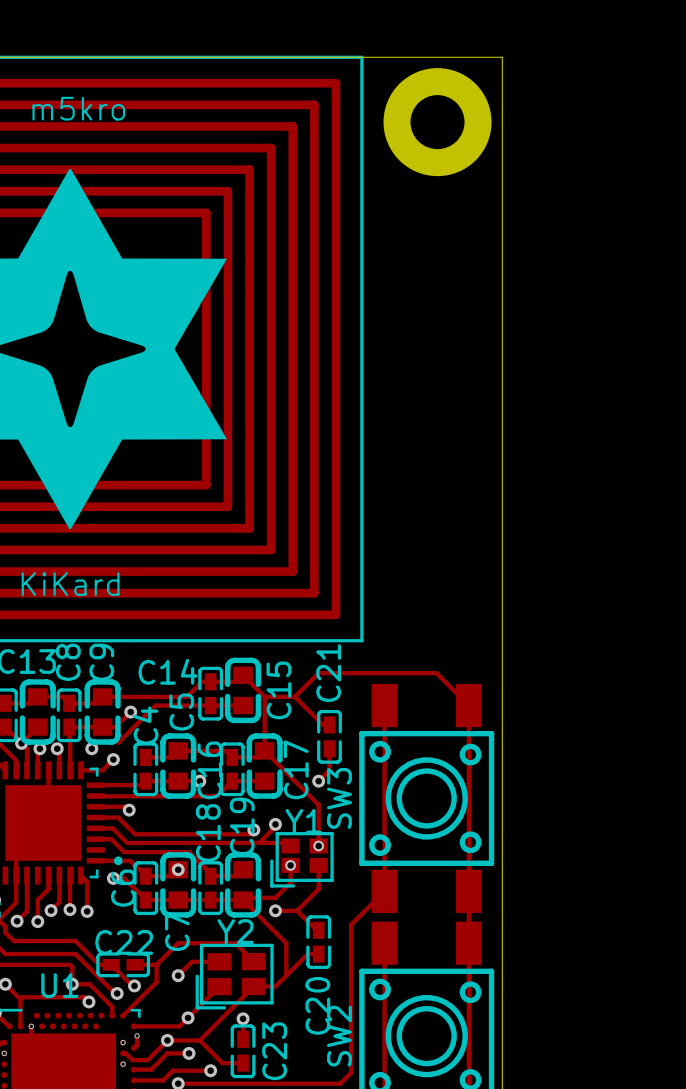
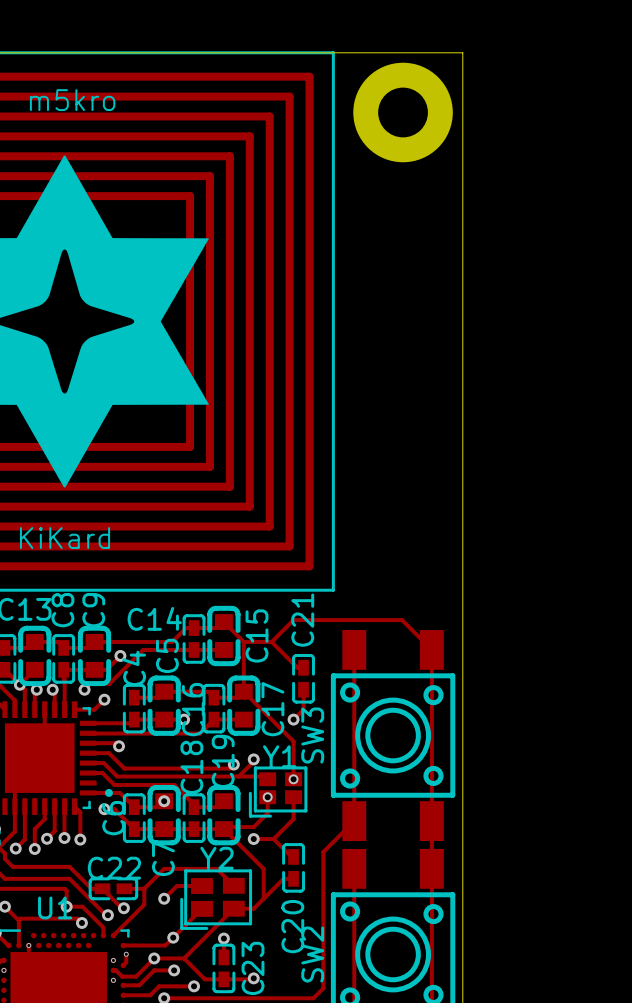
track: none -> (253, 978) (223, 979)
via: none -> (253, 978)

